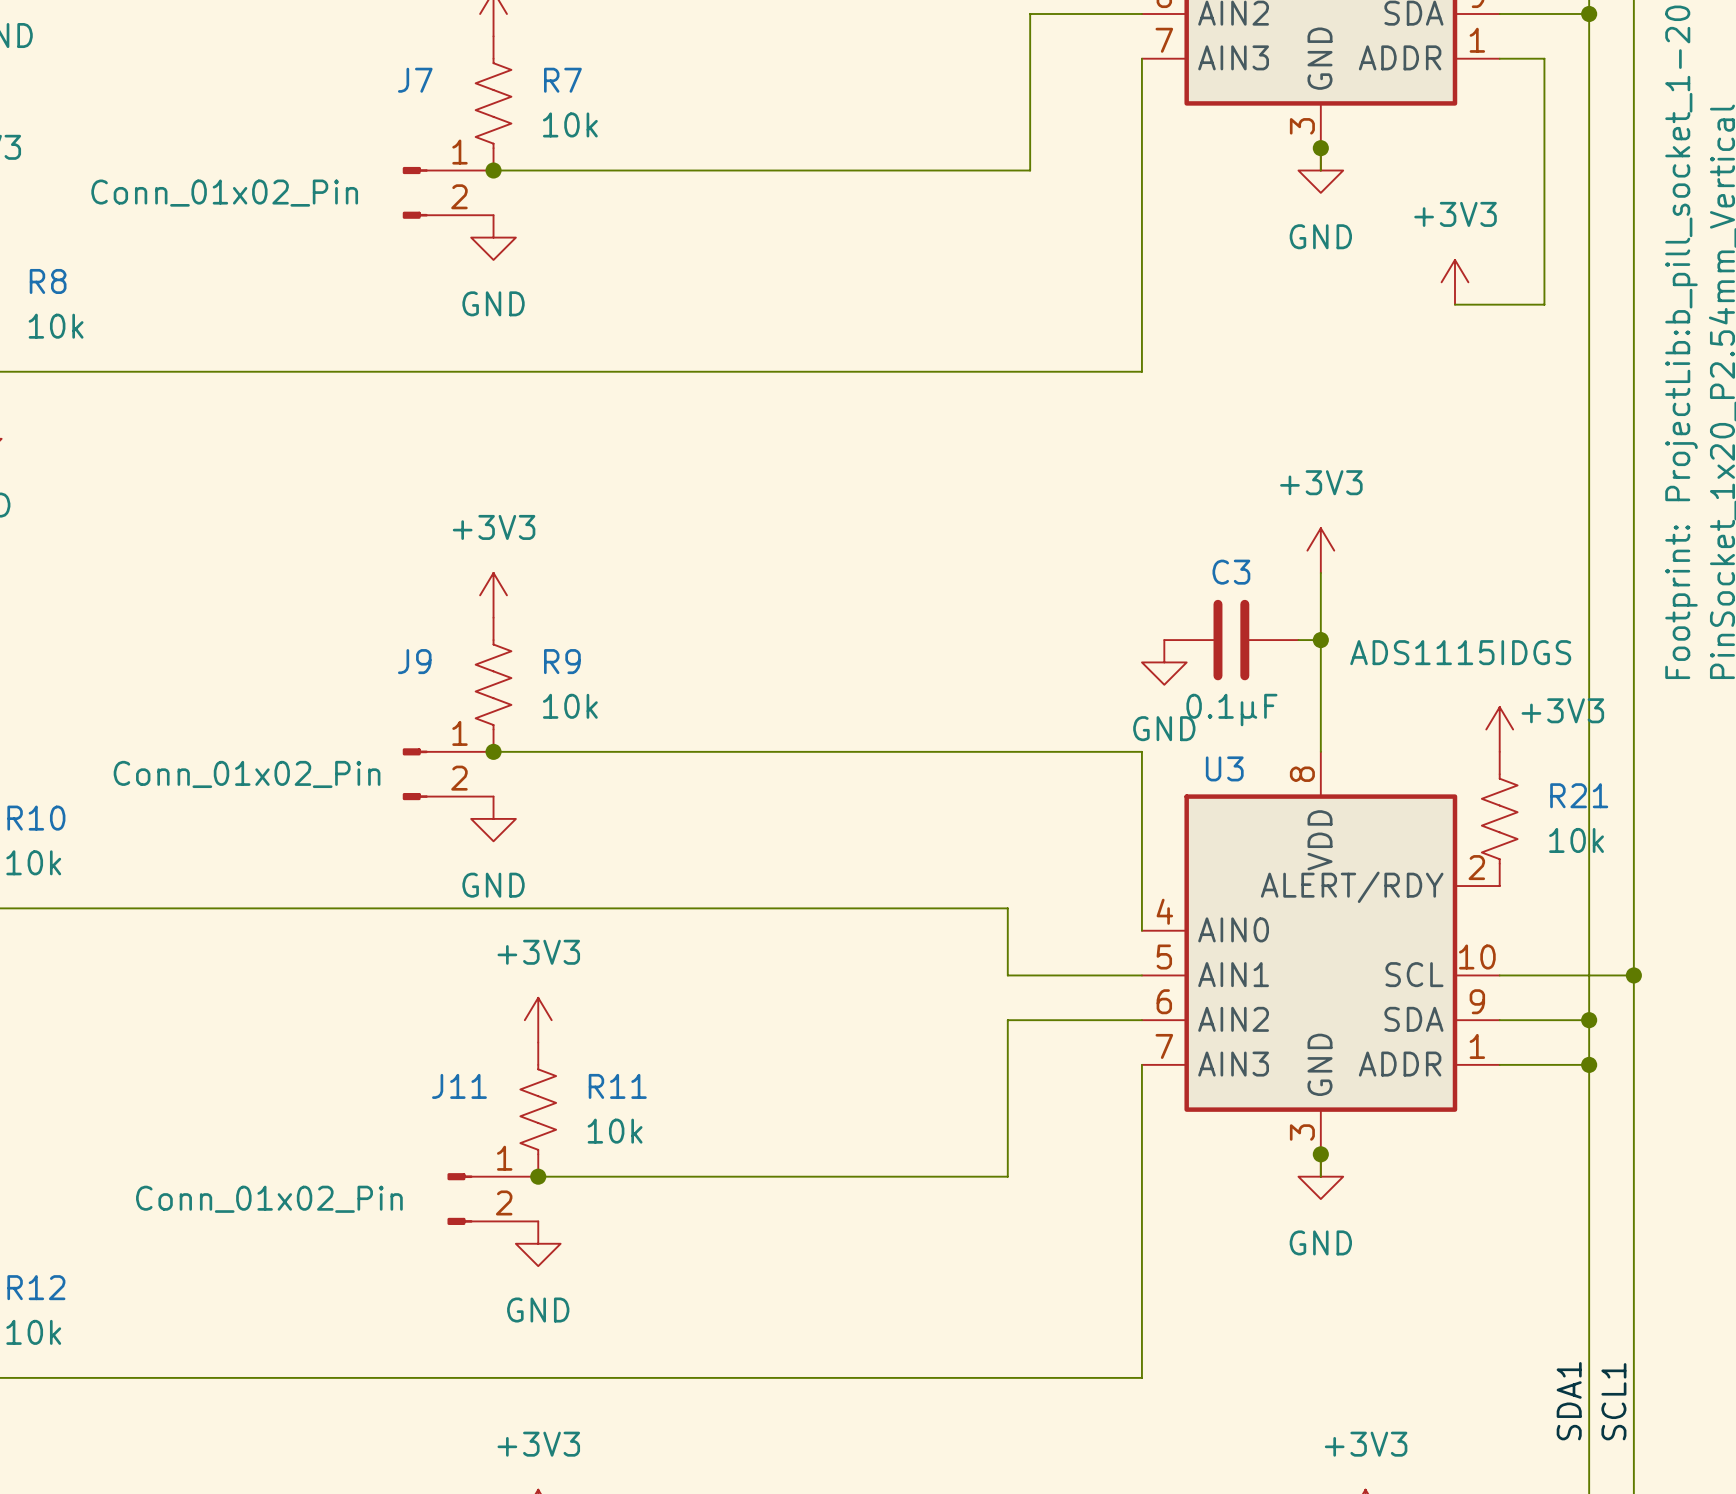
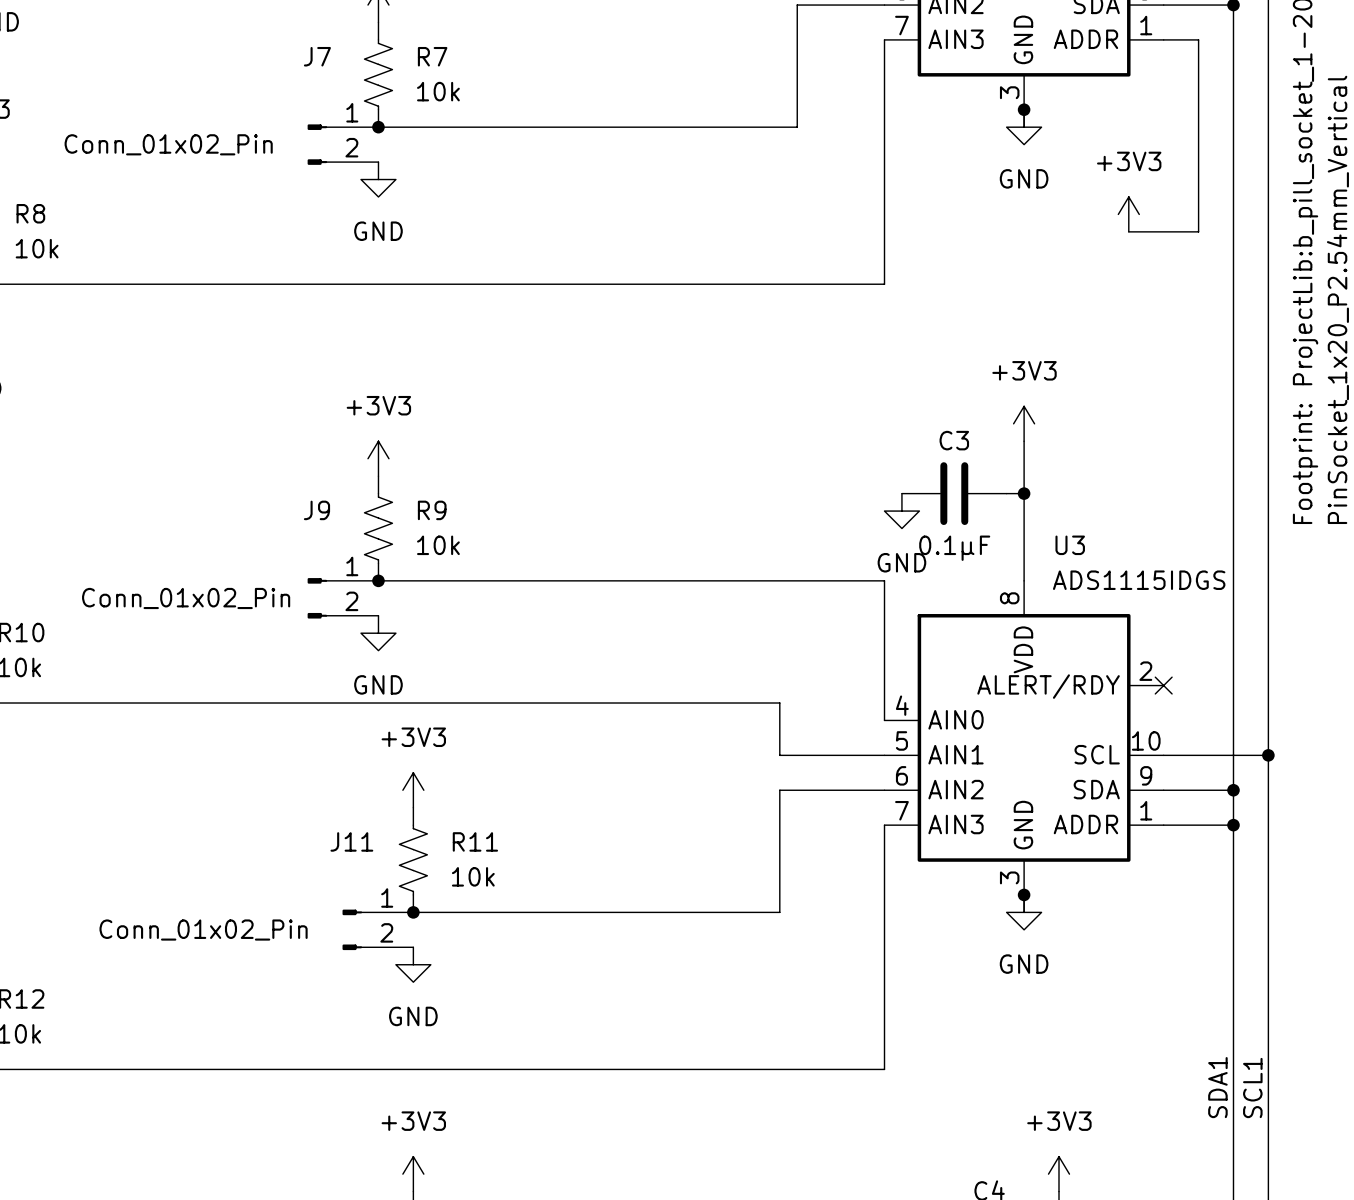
U3 value position: ADS1115IDGS (1460, 652) -> ADS1115IDGS (1139, 580)
power symbol: +3V3 (1499, 729) -> none
U3 name position: U3 (1224, 768) -> U3 (1070, 545)
R21: 10k (1499, 818) -> none
no-connect mark: none -> (1163, 685)

